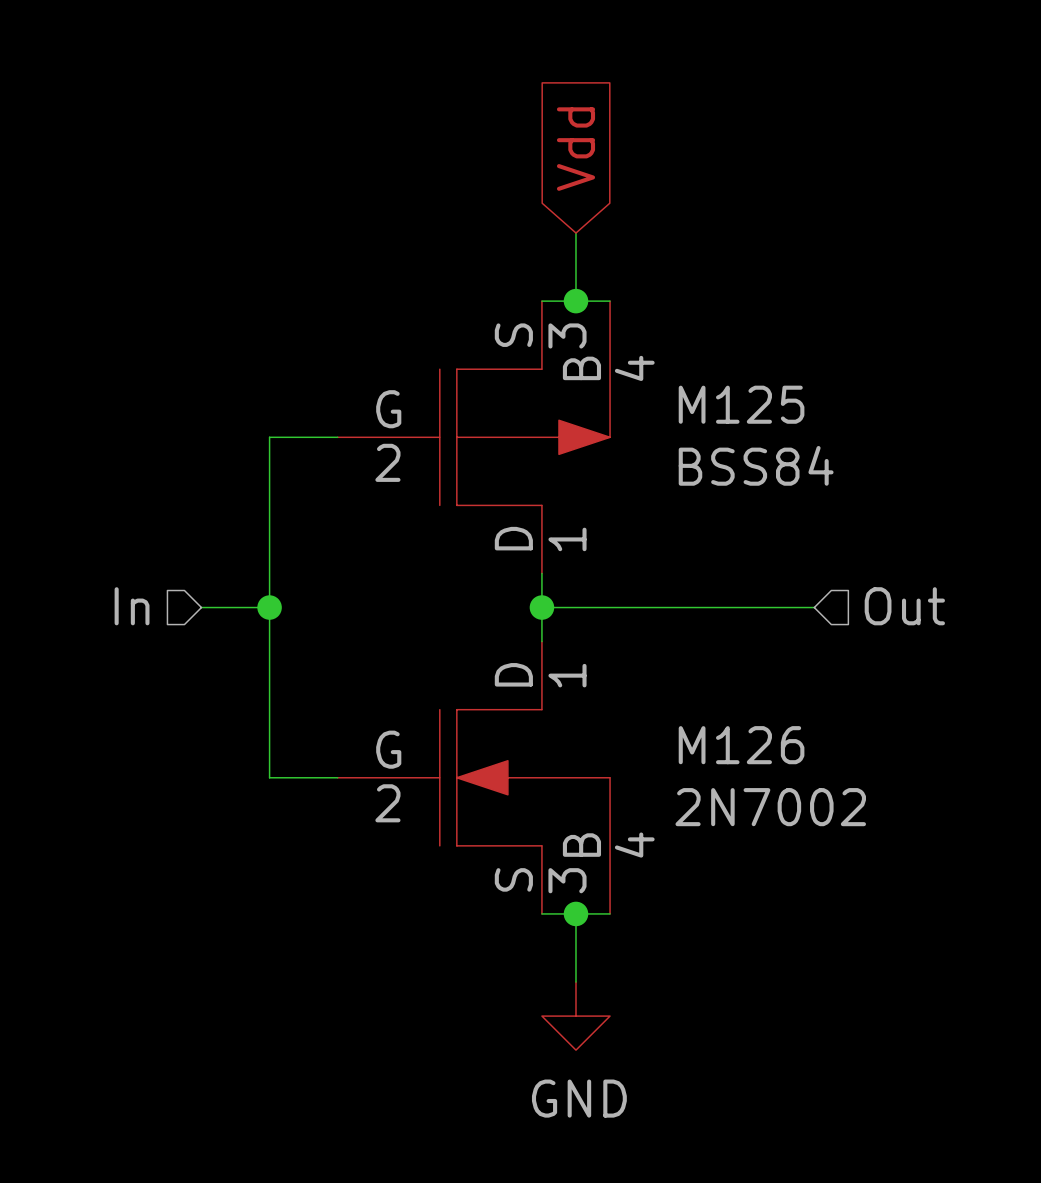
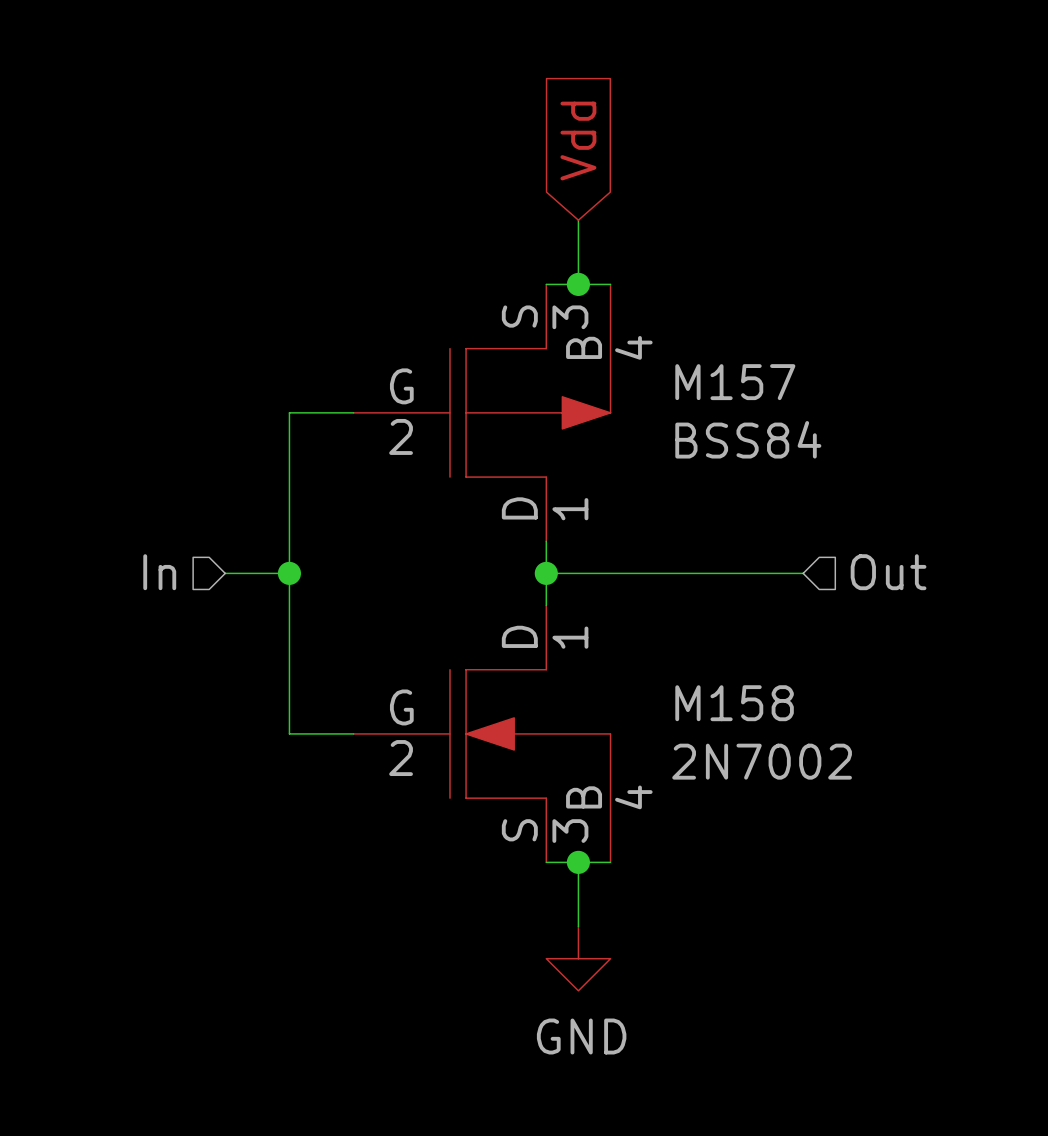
M125 name: M125 (741, 404) -> M157 (735, 382)
M126 name: M126 (741, 745) -> M158 (734, 703)

